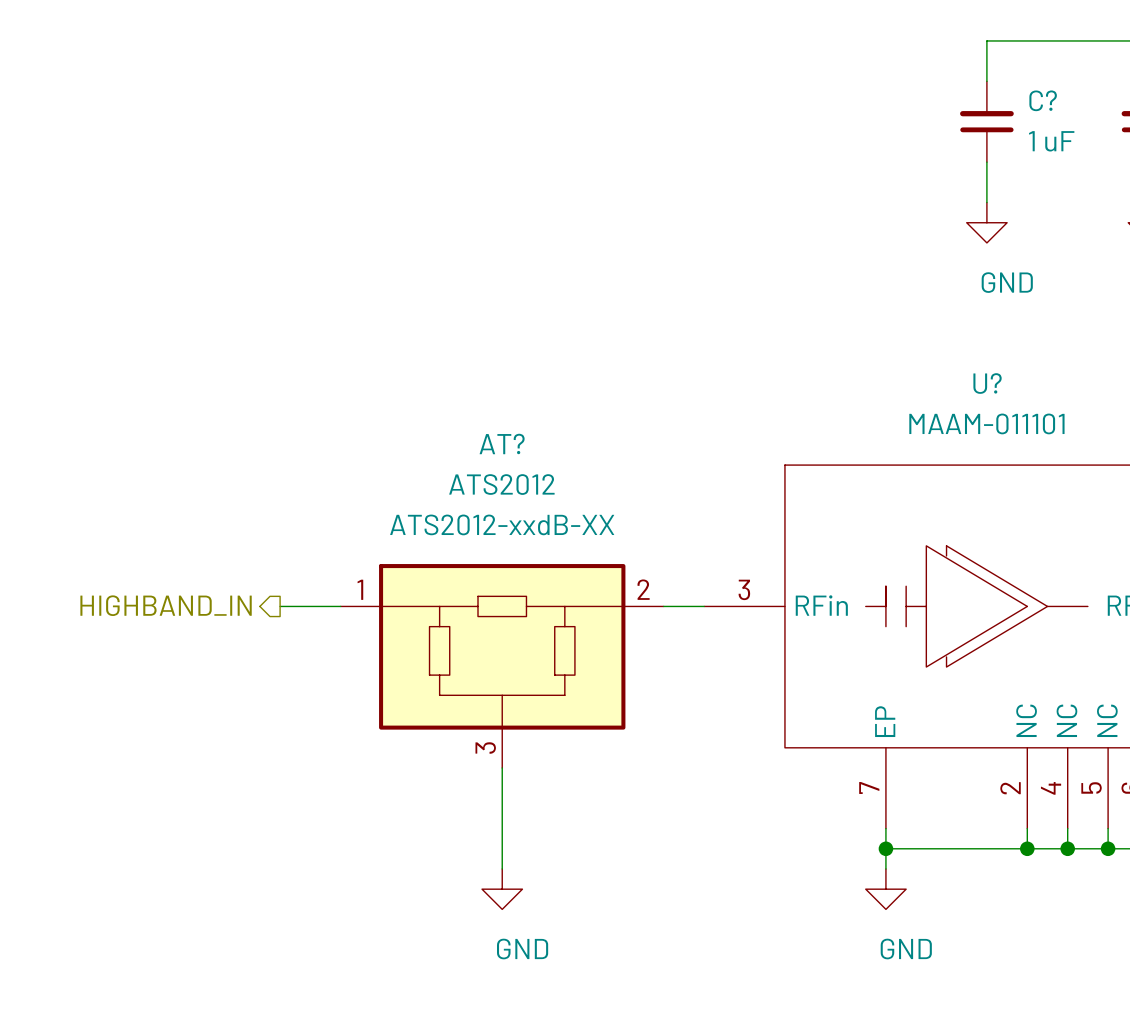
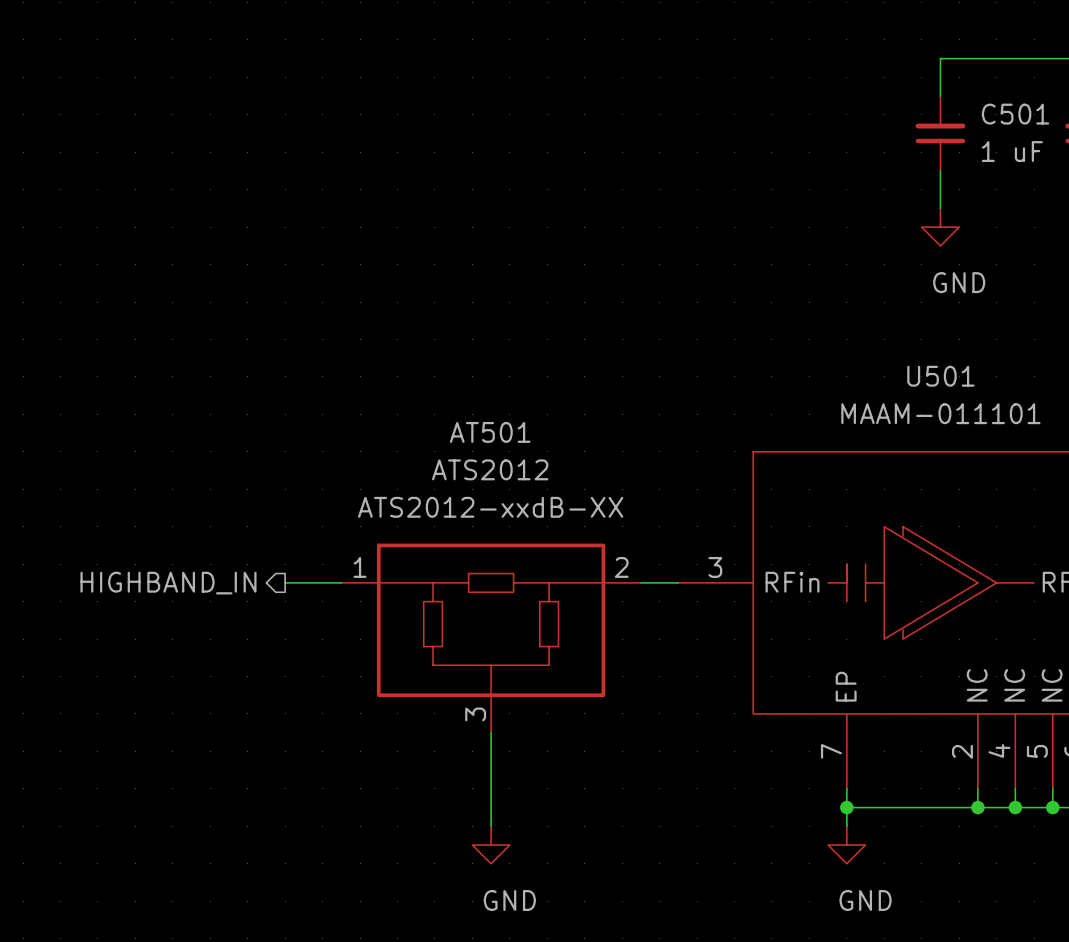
C? name: C? (1043, 100) -> C501 (1015, 114)
U? name: U? (987, 383) -> U501 (940, 376)
AT? name: AT? (502, 444) -> AT501 (490, 432)

